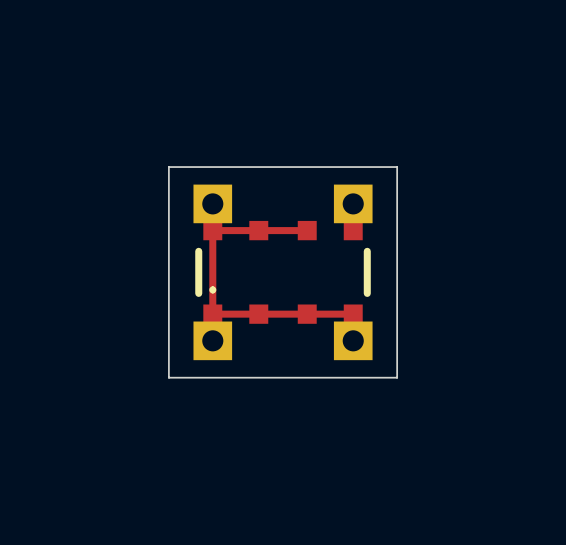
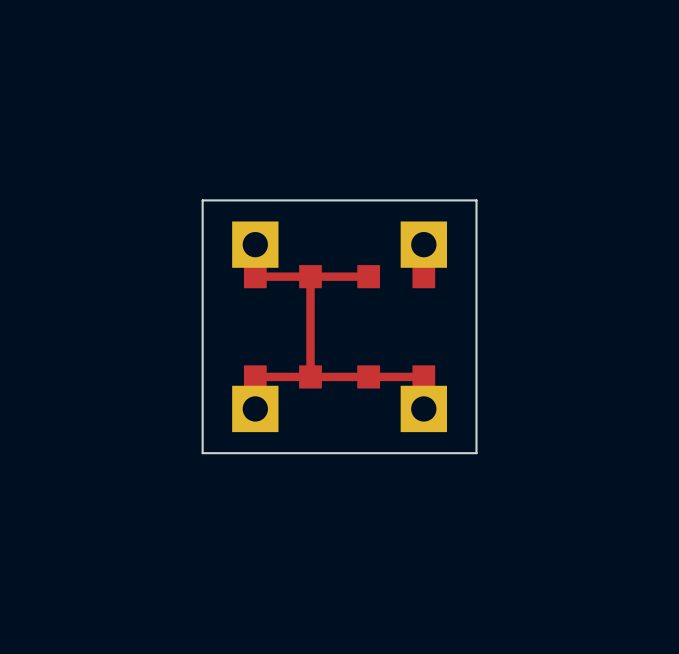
part footprint: [195, 220, 371, 324] -> [243, 265, 436, 389]
track: (212, 230) (212, 314) -> (310, 276) (310, 376)

